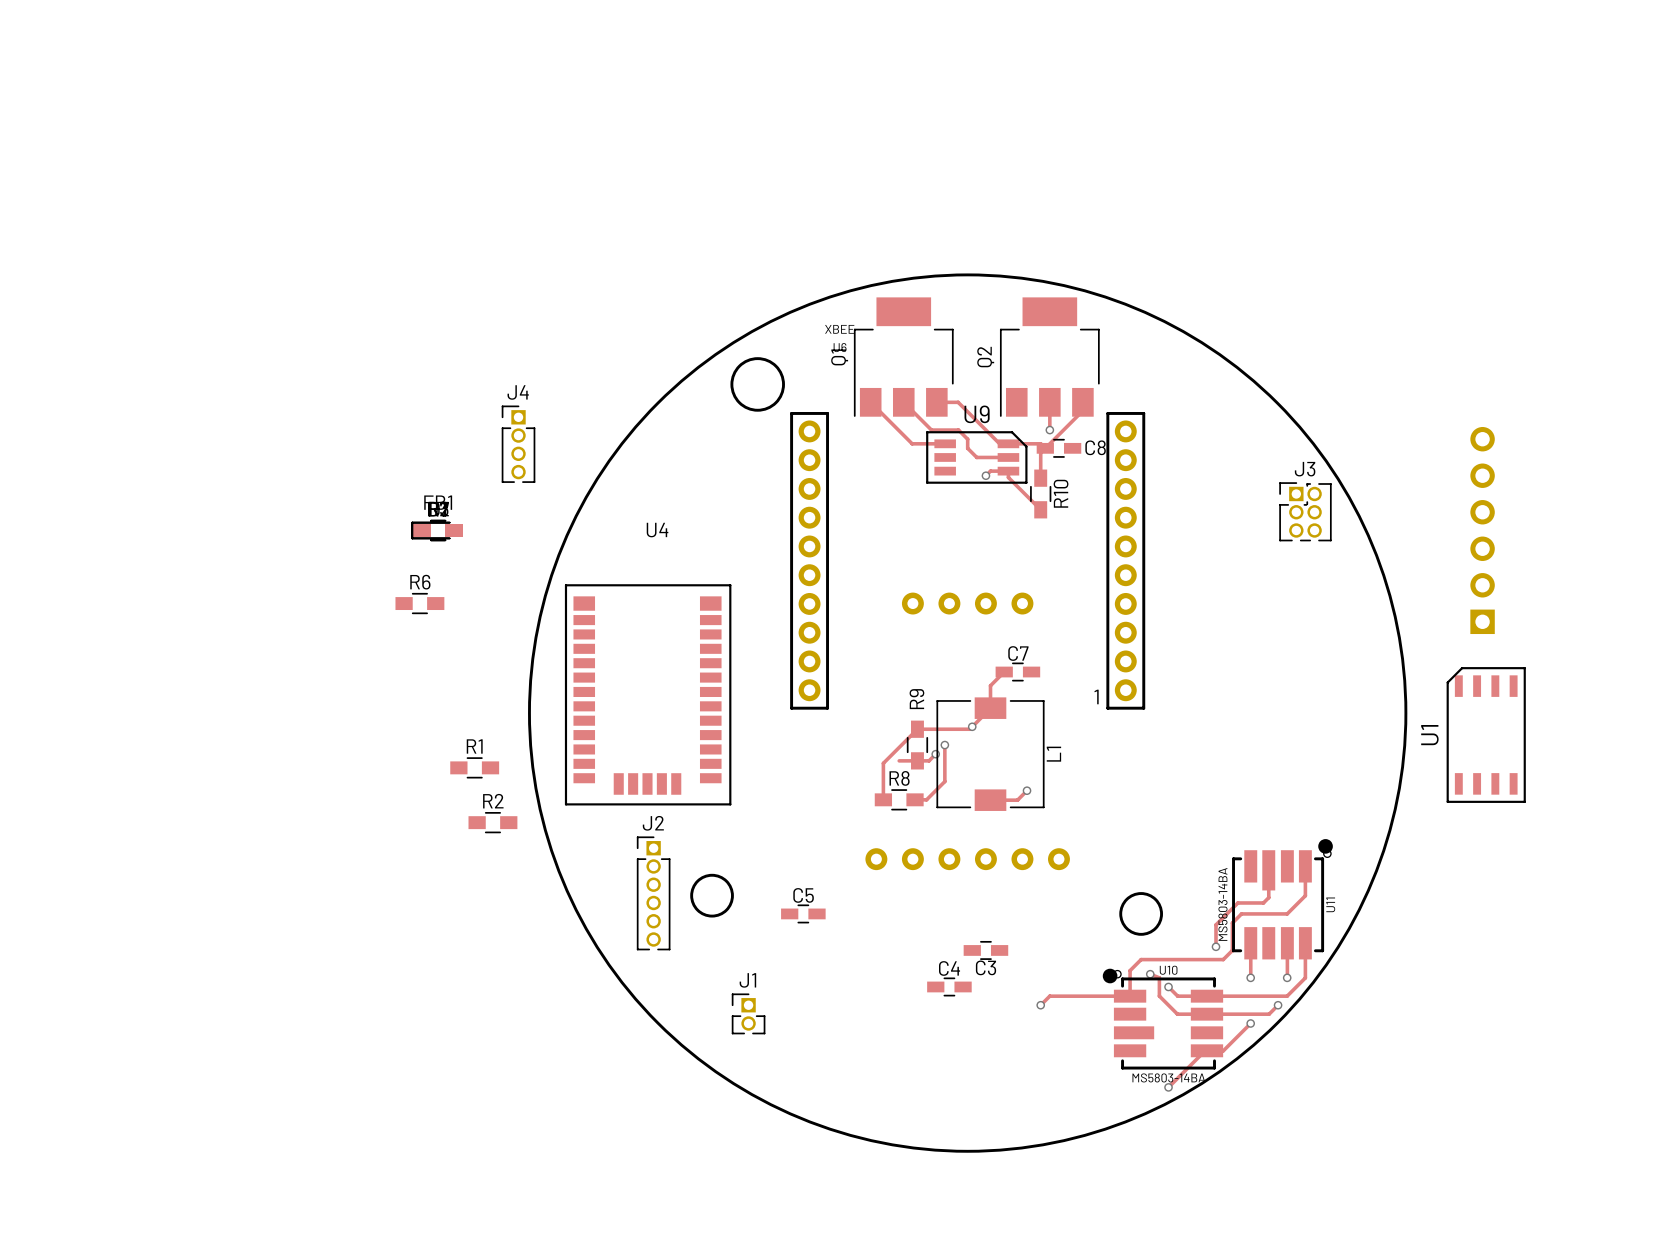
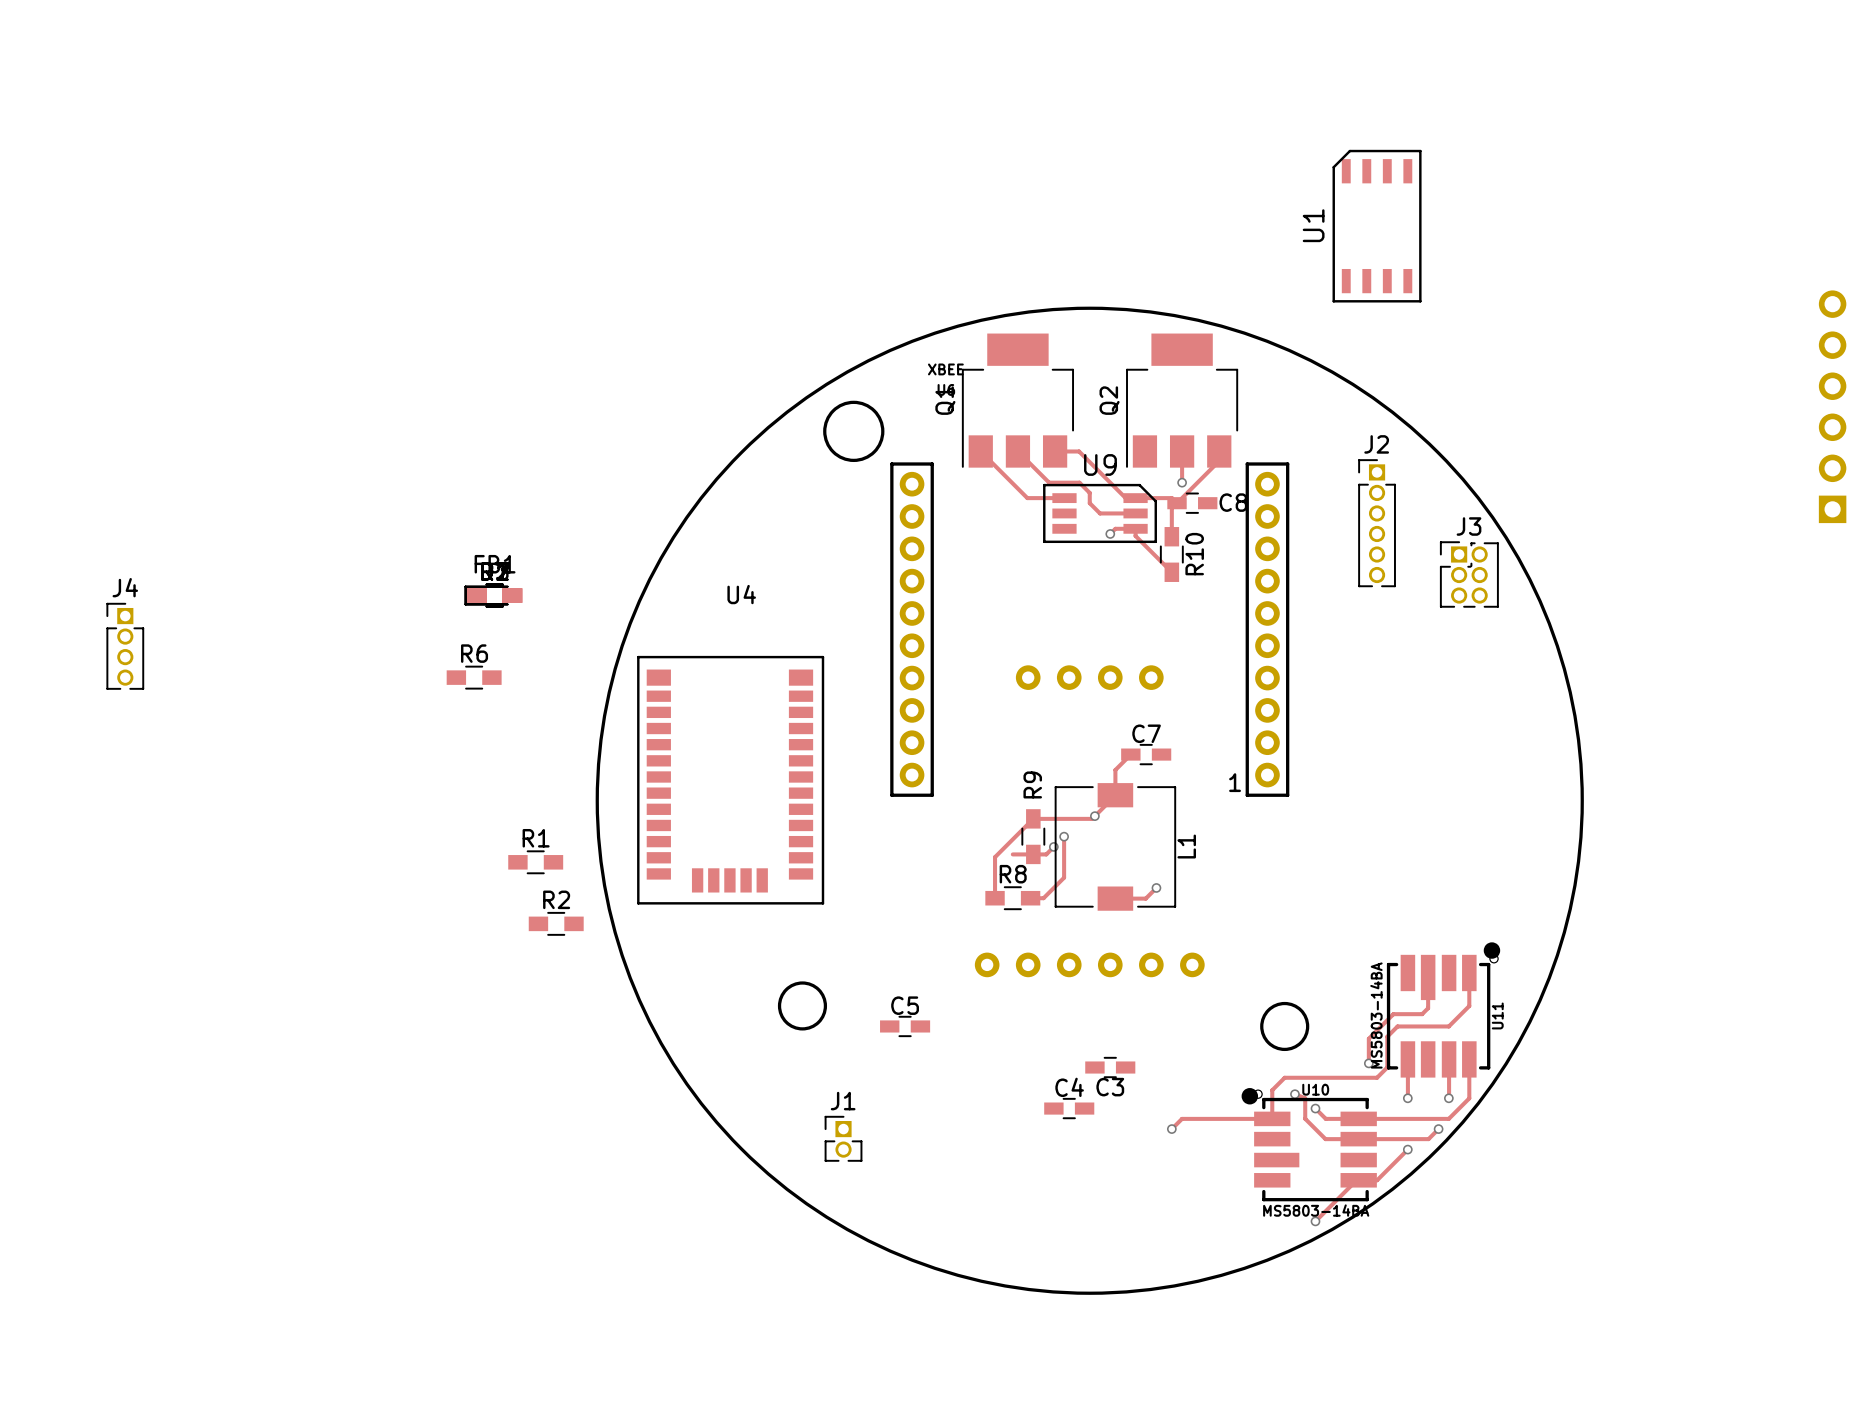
J4 position: (518, 444) -> (125, 646)
part position: (1482, 530) -> (1832, 406)
U1 position: (1486, 735) -> (1377, 226)
J2 position: (653, 893) -> (1377, 523)

